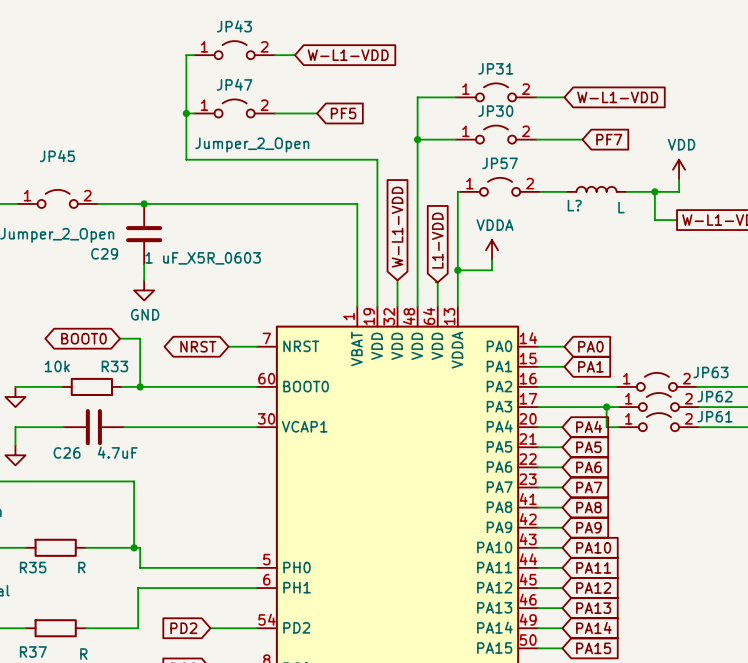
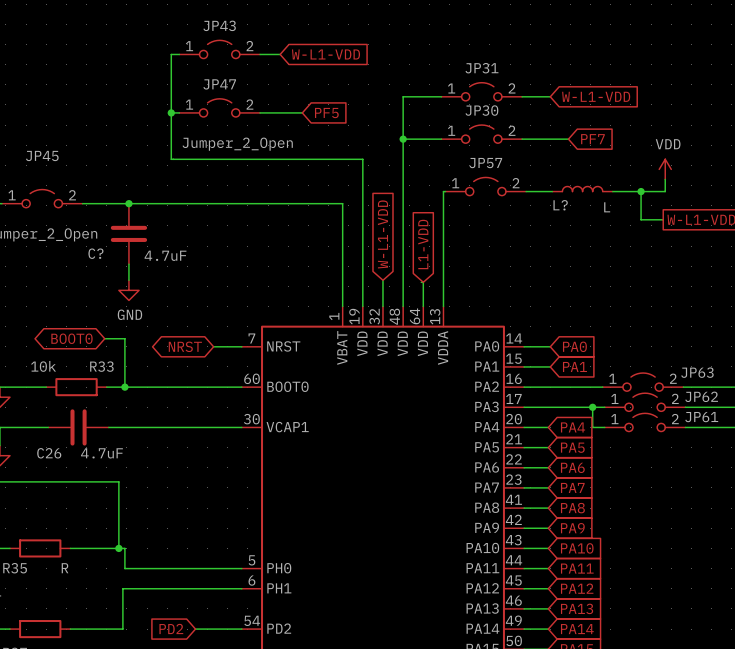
power symbol: VDDA (492, 250) -> none
C29 name: C29 (104, 253) -> C? (95, 253)
C29 value: 1 uF_X5R_0603 (203, 258) -> 4.7uF (165, 255)
wire: (492, 260) (492, 270) (457, 270) -> none
junction: (457, 270) -> none

